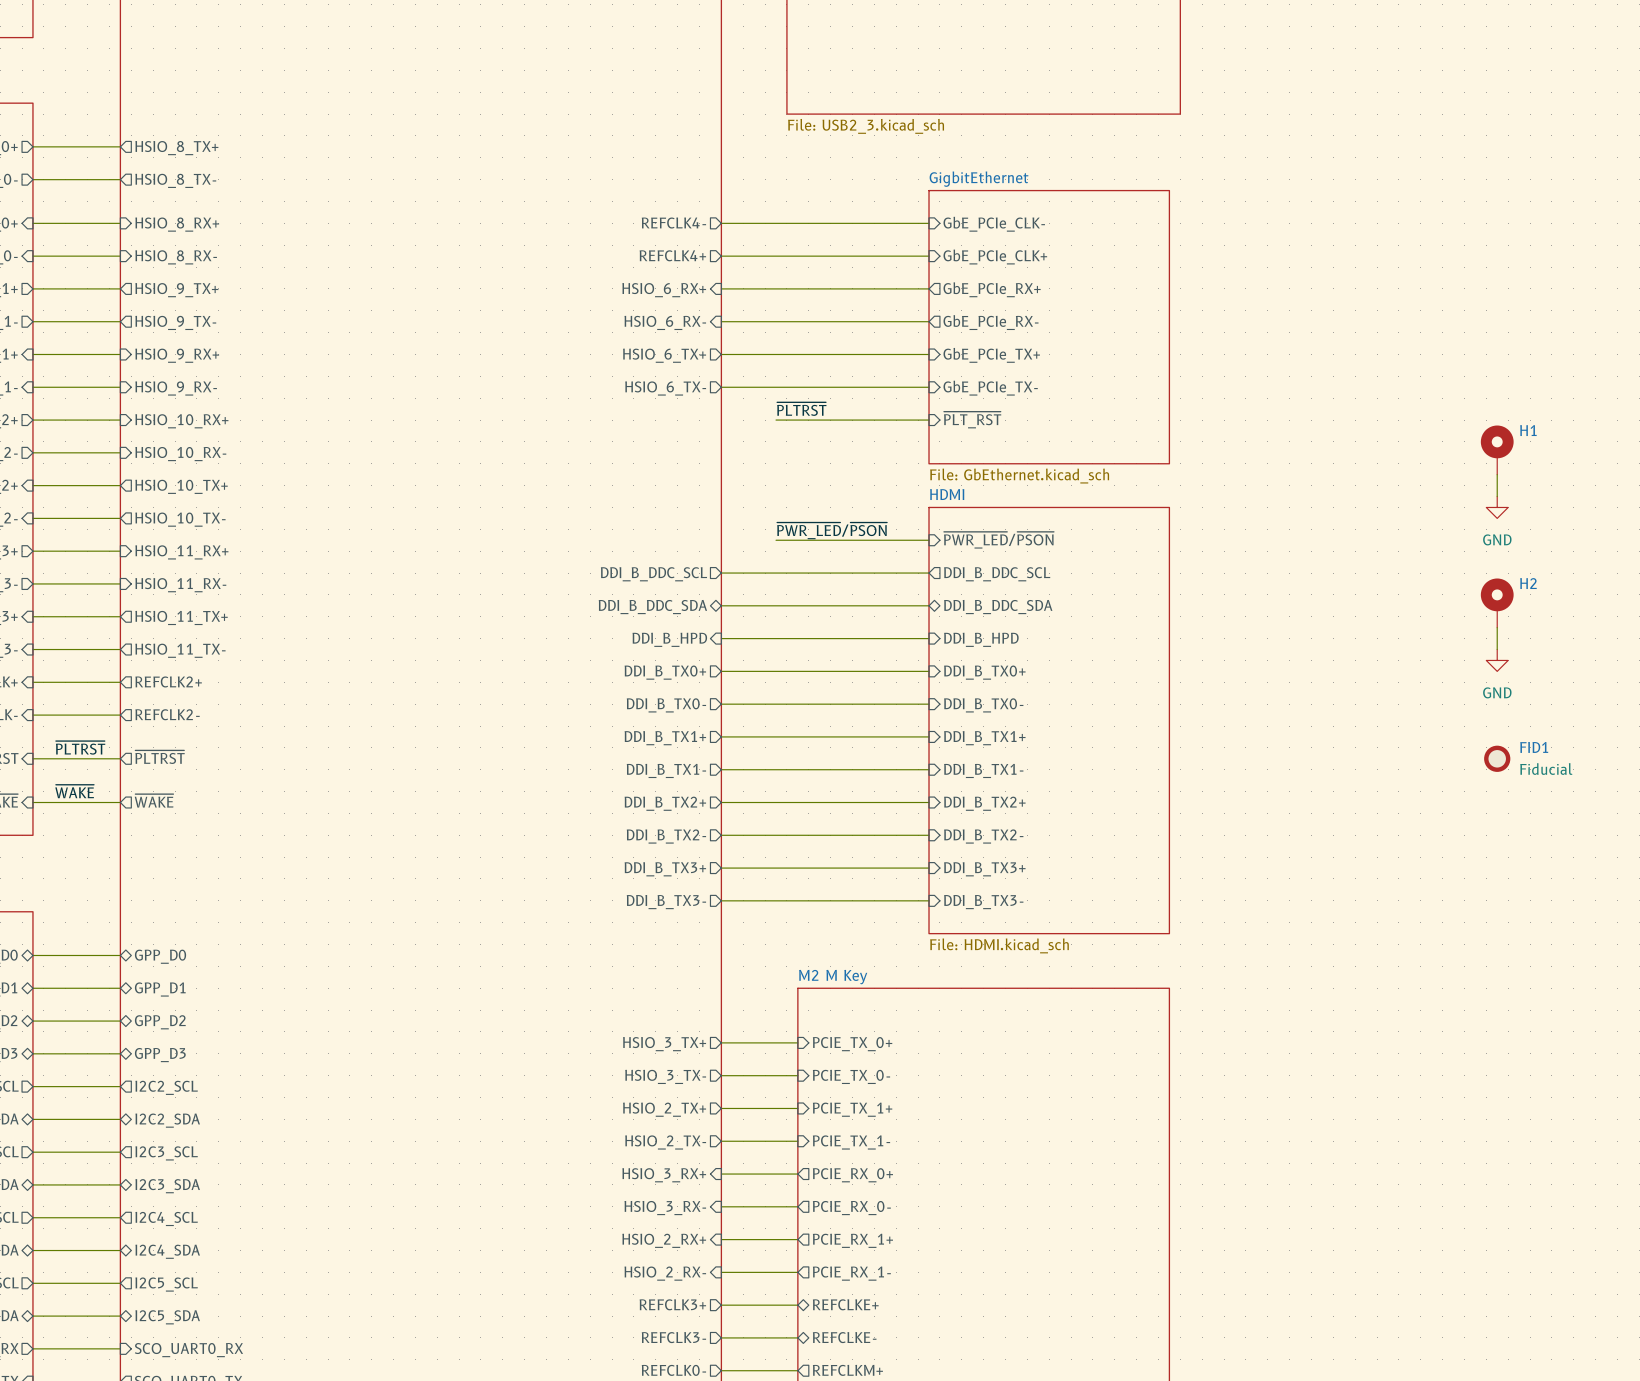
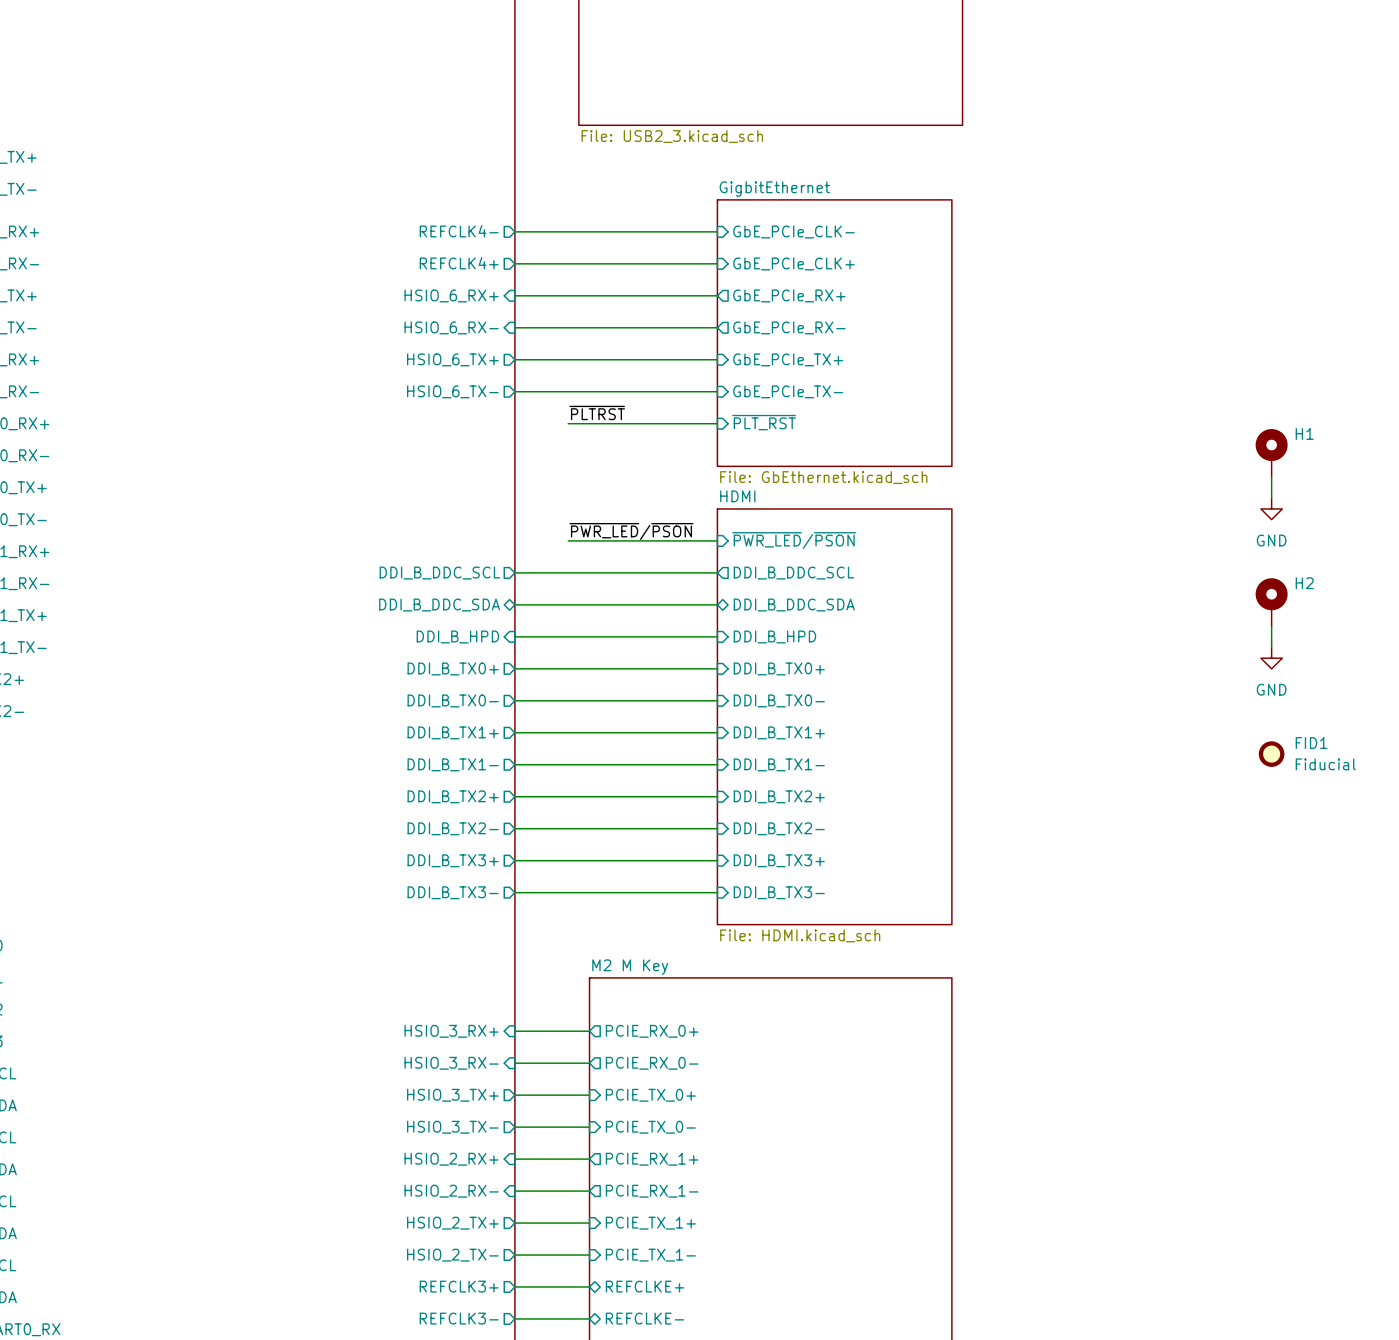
sheet pin shape: output (664, 1044) -> input (451, 1031)
sheet pin: HSIO_3_TX+ (664, 1044) -> HSIO_3_RX+ (451, 1031)
sheet pin shape: input (852, 1044) -> output (652, 1031)
sheet pin: PCIE_TX_0+ (852, 1044) -> PCIE_RX_0+ (652, 1031)
sheet pin shape: output (665, 1076) -> input (451, 1063)
sheet pin: HSIO_3_TX- (665, 1076) -> HSIO_3_RX- (451, 1063)
sheet pin shape: input (851, 1076) -> output (652, 1063)
sheet pin: PCIE_TX_0- (851, 1076) -> PCIE_RX_0- (652, 1063)
sheet pin: HSIO_2_TX+ (664, 1109) -> HSIO_3_TX+ (452, 1095)
sheet pin: PCIE_TX_1+ (852, 1109) -> PCIE_TX_0+ (650, 1095)
sheet pin: HSIO_2_TX- (665, 1142) -> HSIO_3_TX- (452, 1127)
sheet pin: PCIE_TX_1- (851, 1142) -> PCIE_TX_0- (650, 1127)
sheet pin: HSIO_3_RX+ (664, 1175) -> HSIO_2_RX+ (451, 1159)
sheet pin: PCIE_RX_0+ (852, 1175) -> PCIE_RX_1+ (652, 1159)
sheet pin: HSIO_3_RX- (665, 1208) -> HSIO_2_RX- (451, 1191)
sheet pin: PCIE_RX_0- (851, 1208) -> PCIE_RX_1- (652, 1191)
sheet pin shape: input (664, 1240) -> output (452, 1223)
sheet pin: HSIO_2_RX+ (664, 1240) -> HSIO_2_TX+ (452, 1223)
sheet pin shape: output (852, 1240) -> input (650, 1223)
sheet pin: PCIE_RX_1+ (852, 1240) -> PCIE_TX_1+ (650, 1223)
sheet pin shape: input (665, 1273) -> output (452, 1255)
sheet pin: HSIO_2_RX- (665, 1273) -> HSIO_2_TX- (452, 1255)
sheet pin shape: output (851, 1273) -> input (650, 1255)
sheet pin: PCIE_RX_1- (851, 1273) -> PCIE_TX_1- (650, 1255)

